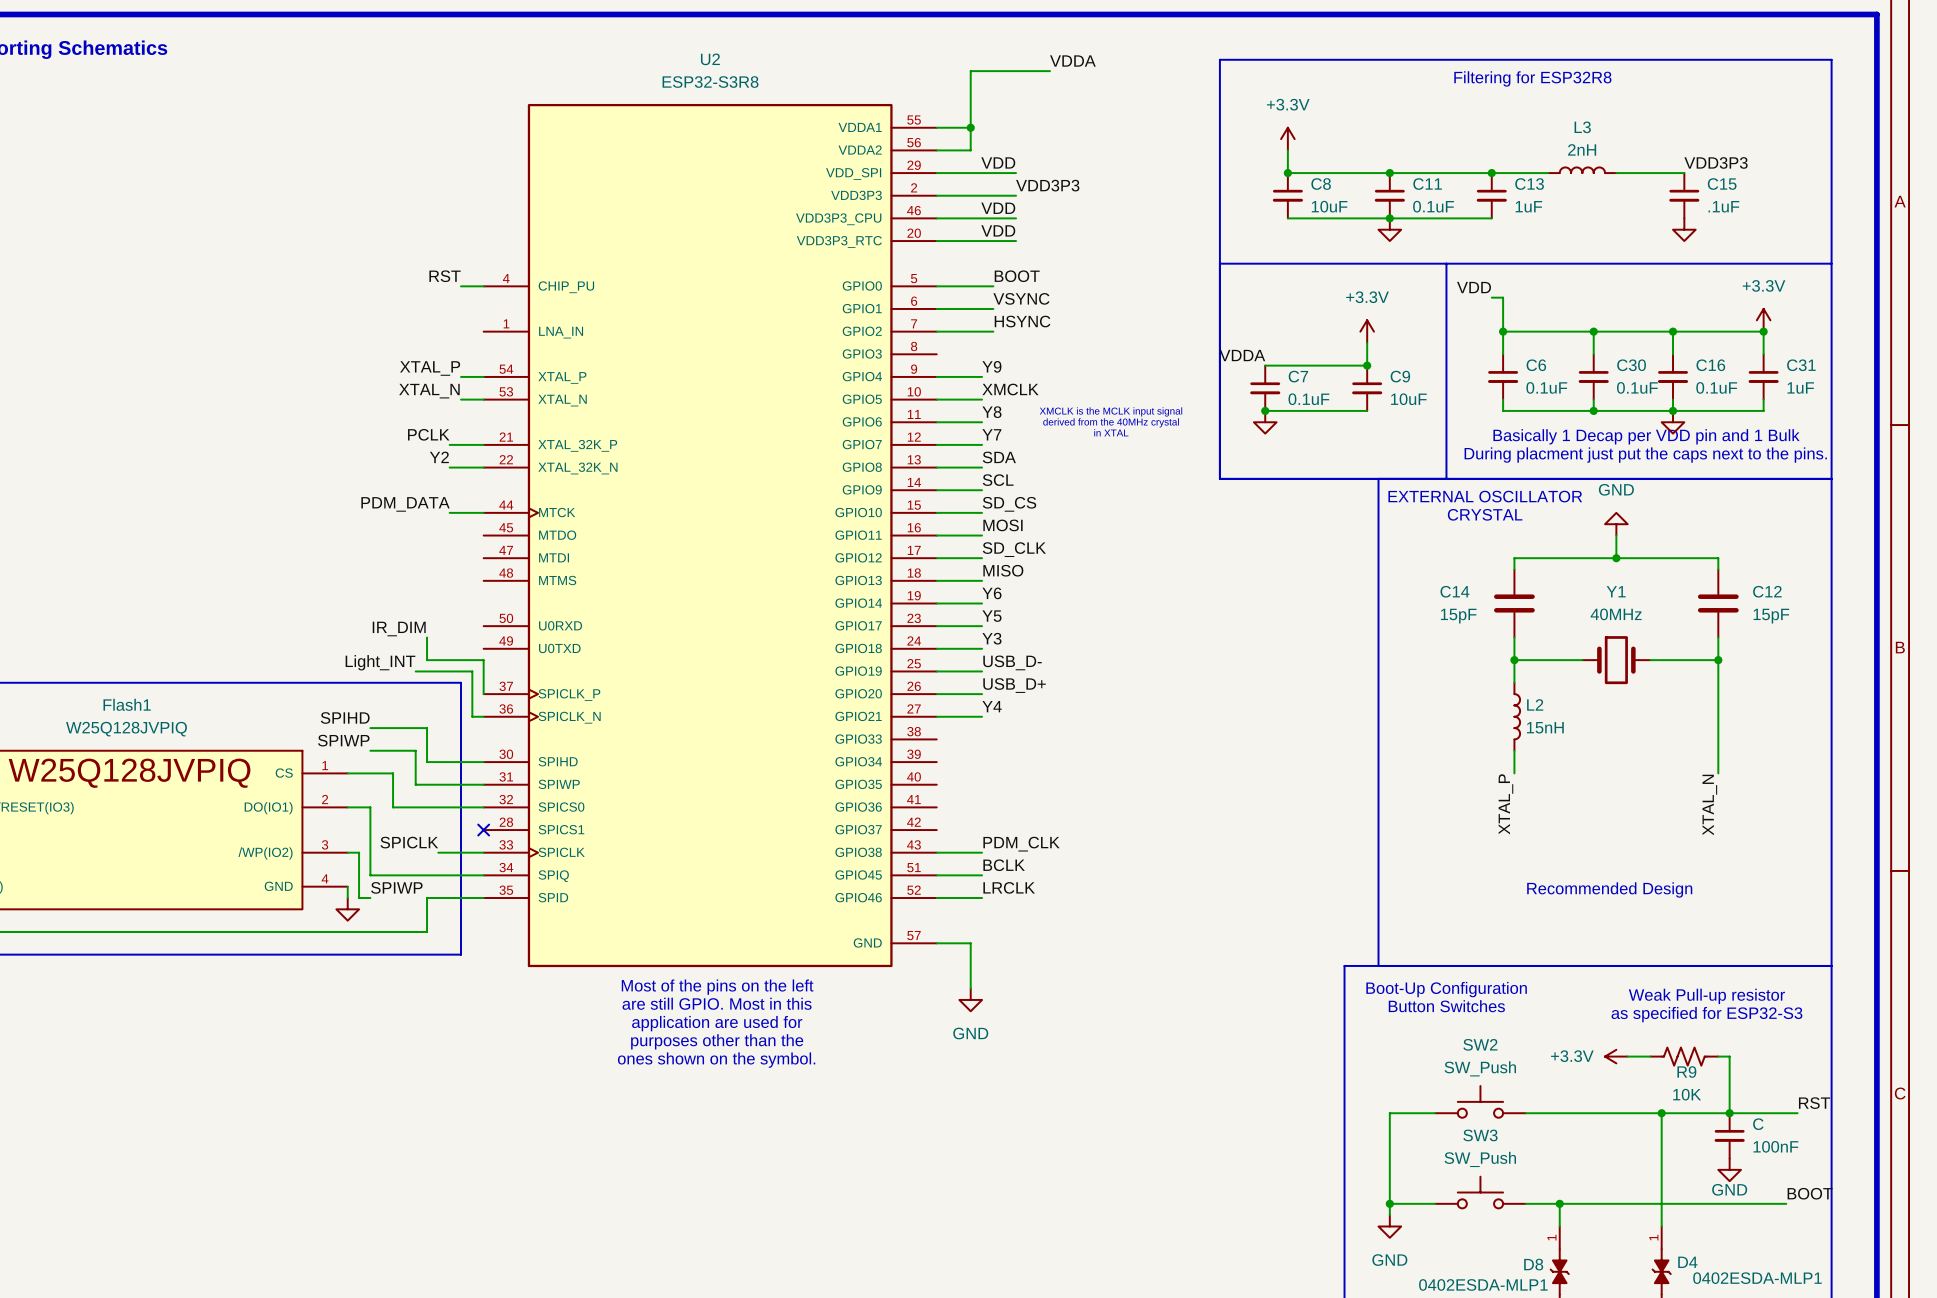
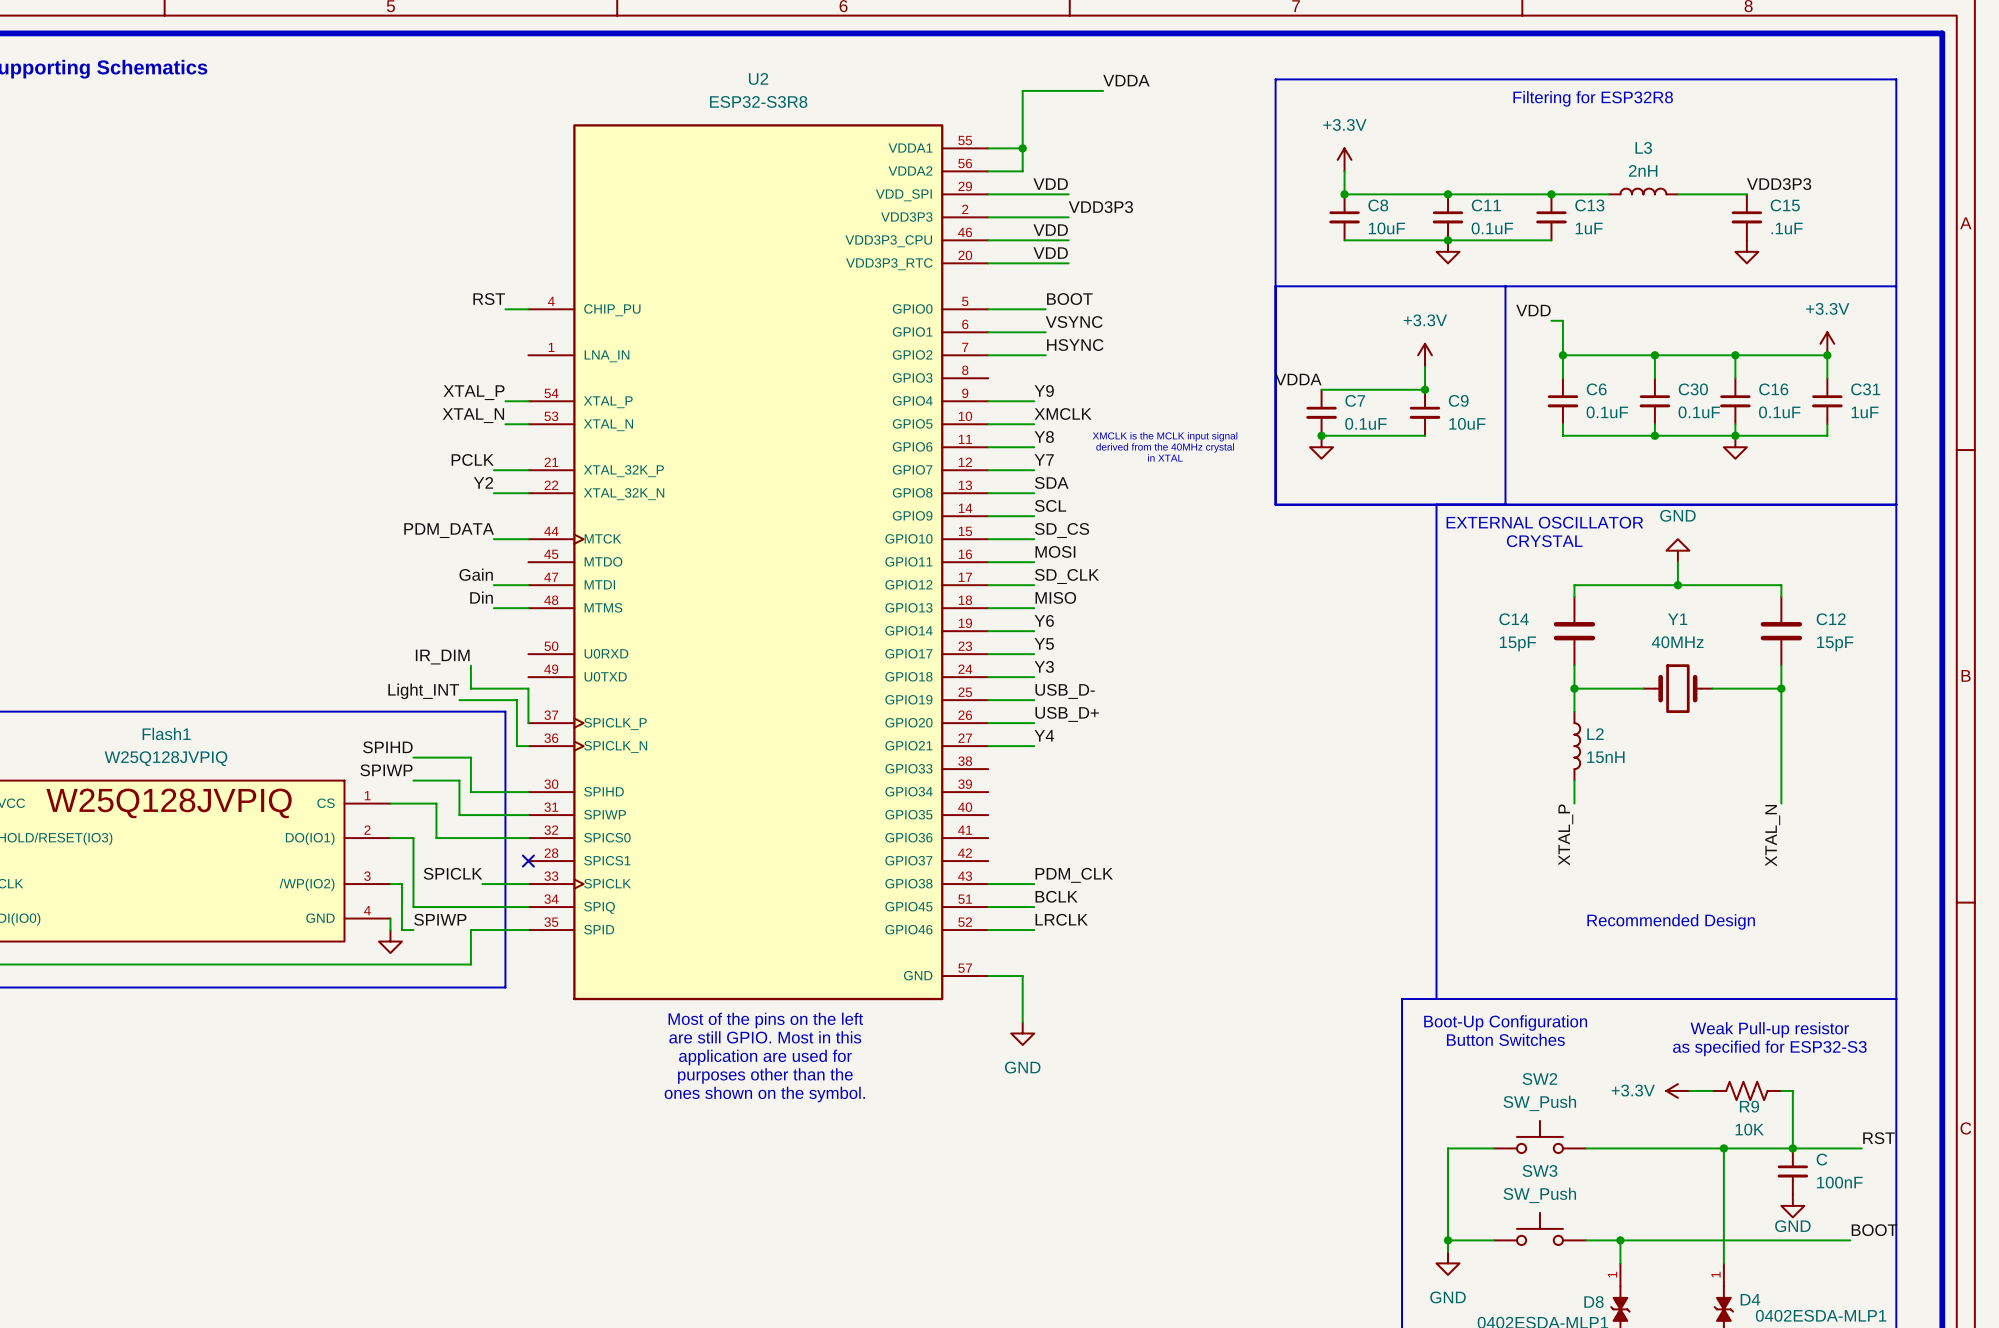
text: Basically 1 Decap per VDD pin and 1 Bulk (1646, 436) -> none
text: During placment just put the caps next to the pins. (1645, 455) -> none
label: none -> Gain (476, 574)
wire: none -> (493, 585) (528, 585)
label: none -> Din (481, 597)
wire: none -> (493, 608) (528, 608)

